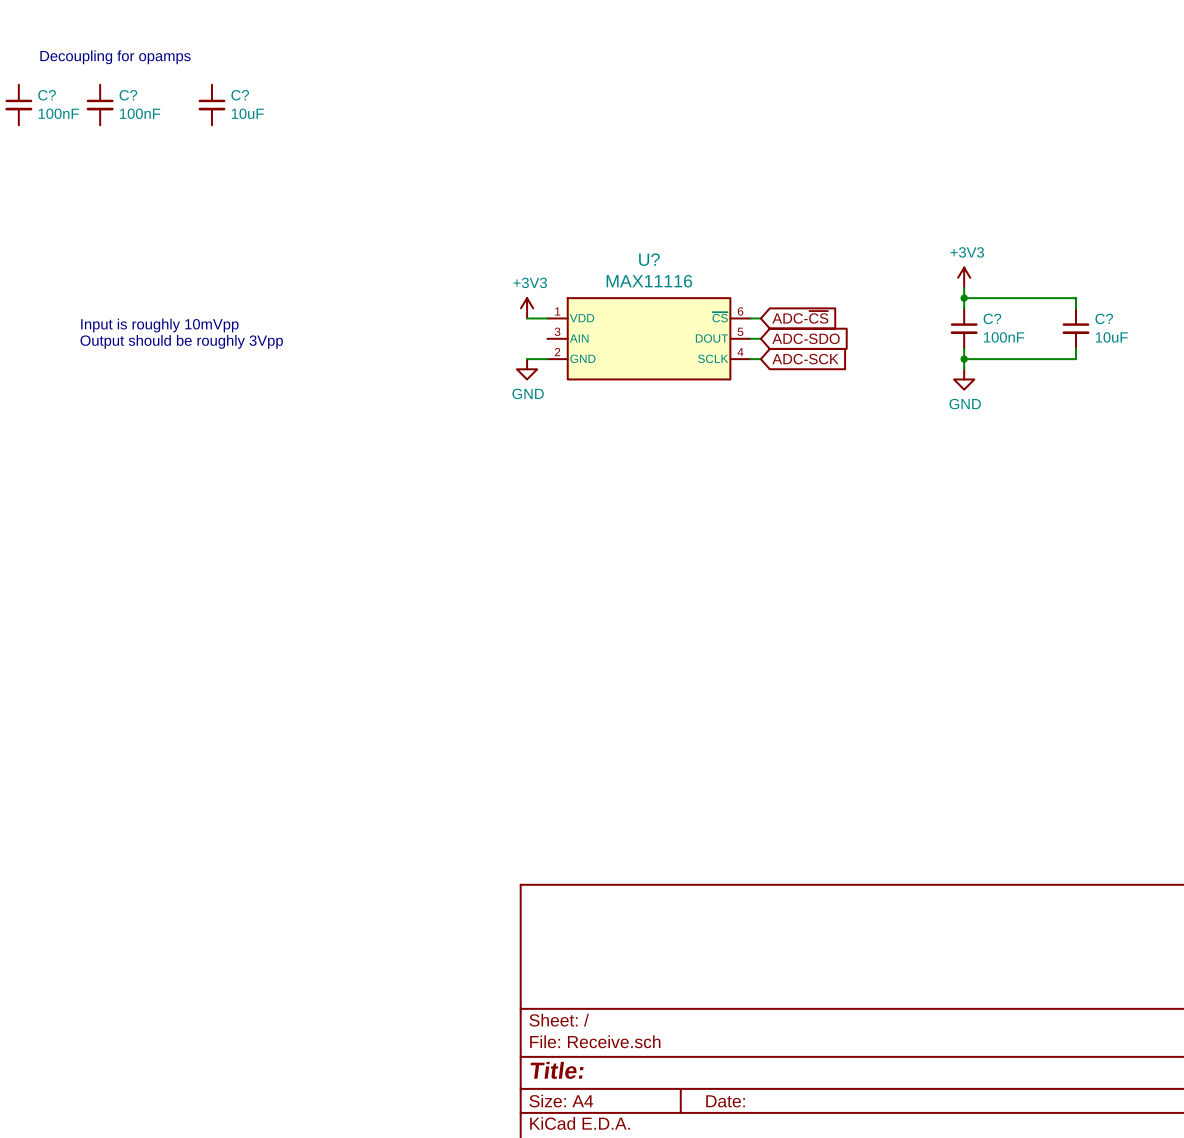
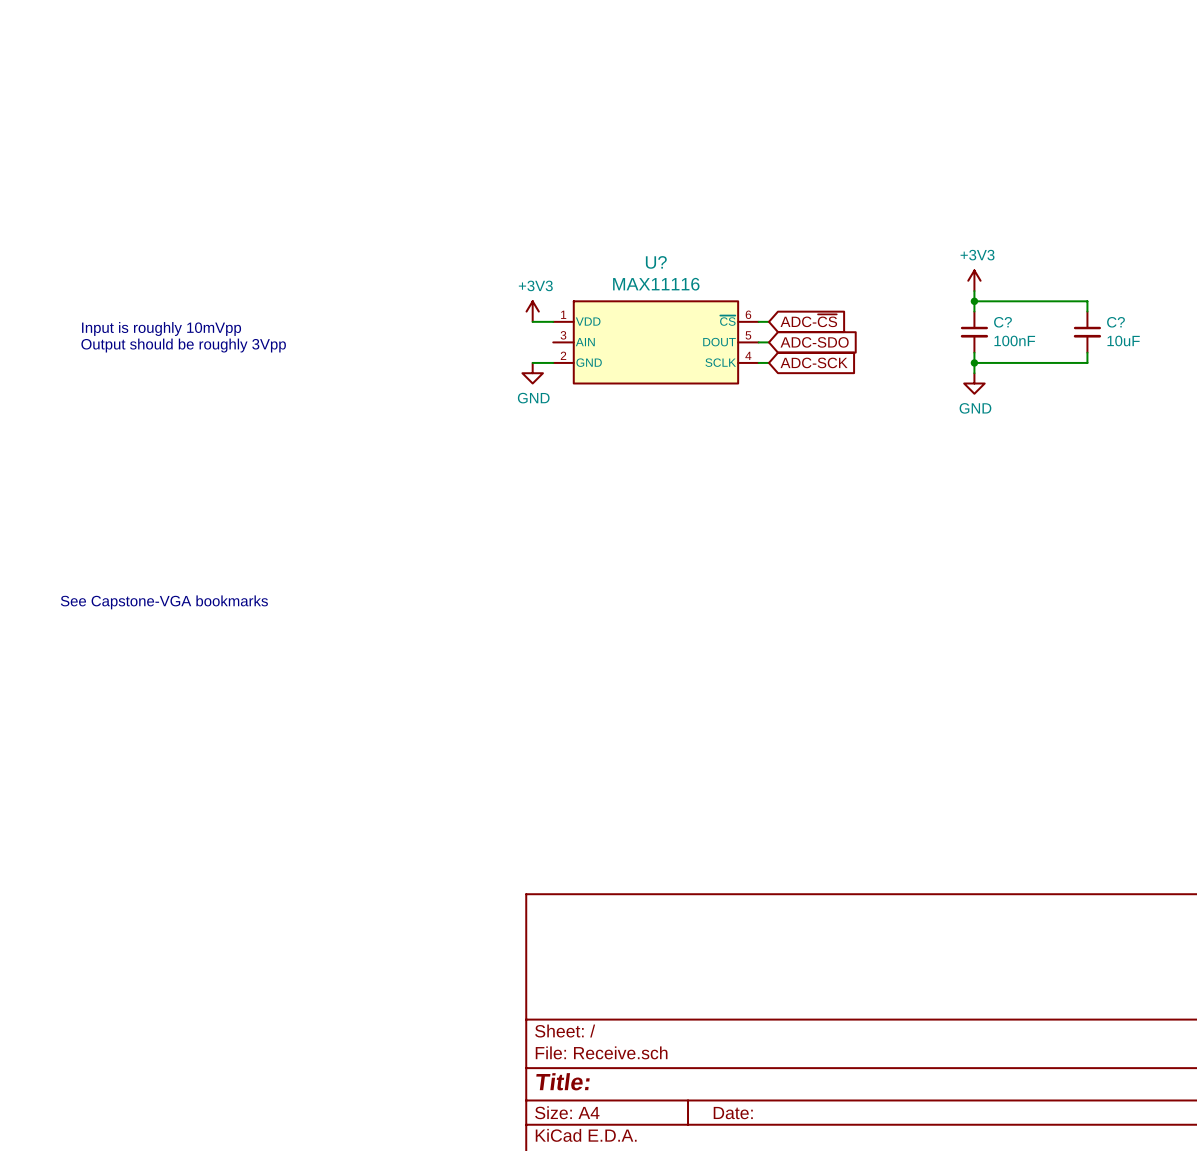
text: Decoupling for opamps (115, 57) -> none
C?: 100nF (18, 105) -> none
C?: 100nF (100, 105) -> none
C?: 10uF (211, 105) -> none
text: none -> See Capstone-VGA bookmarks (164, 602)

